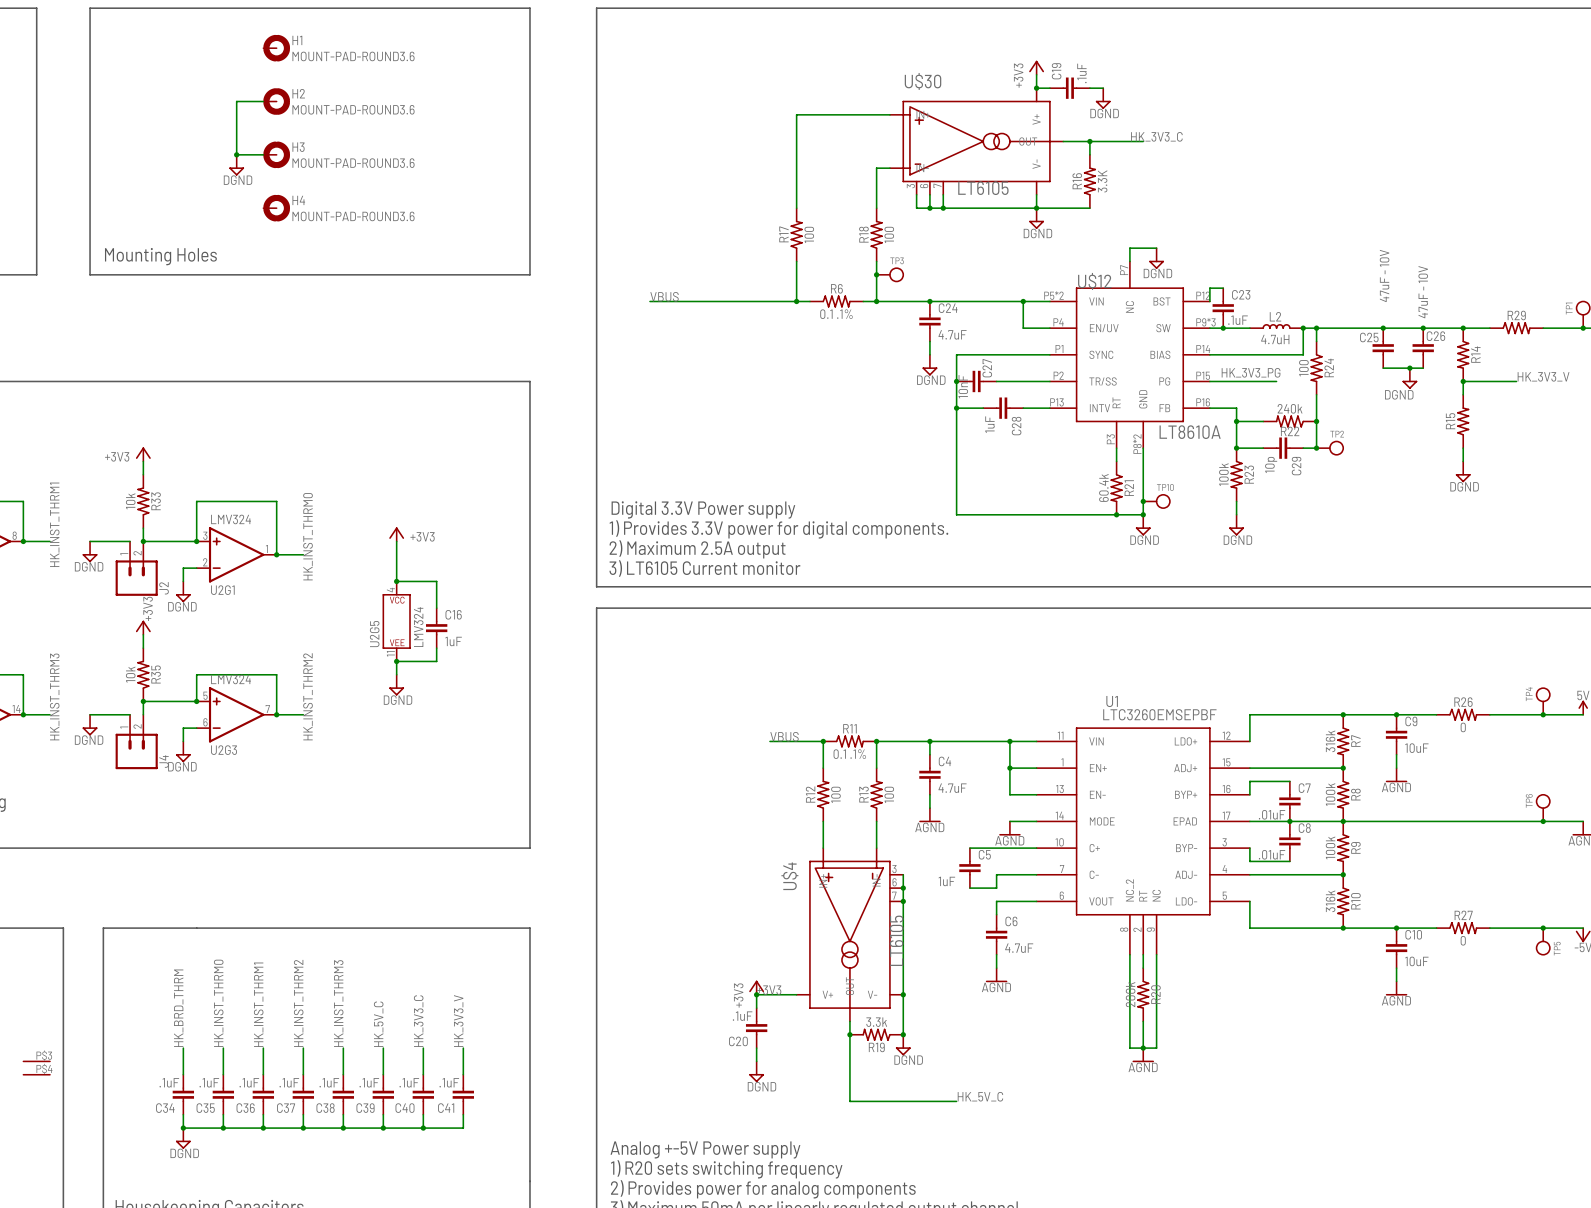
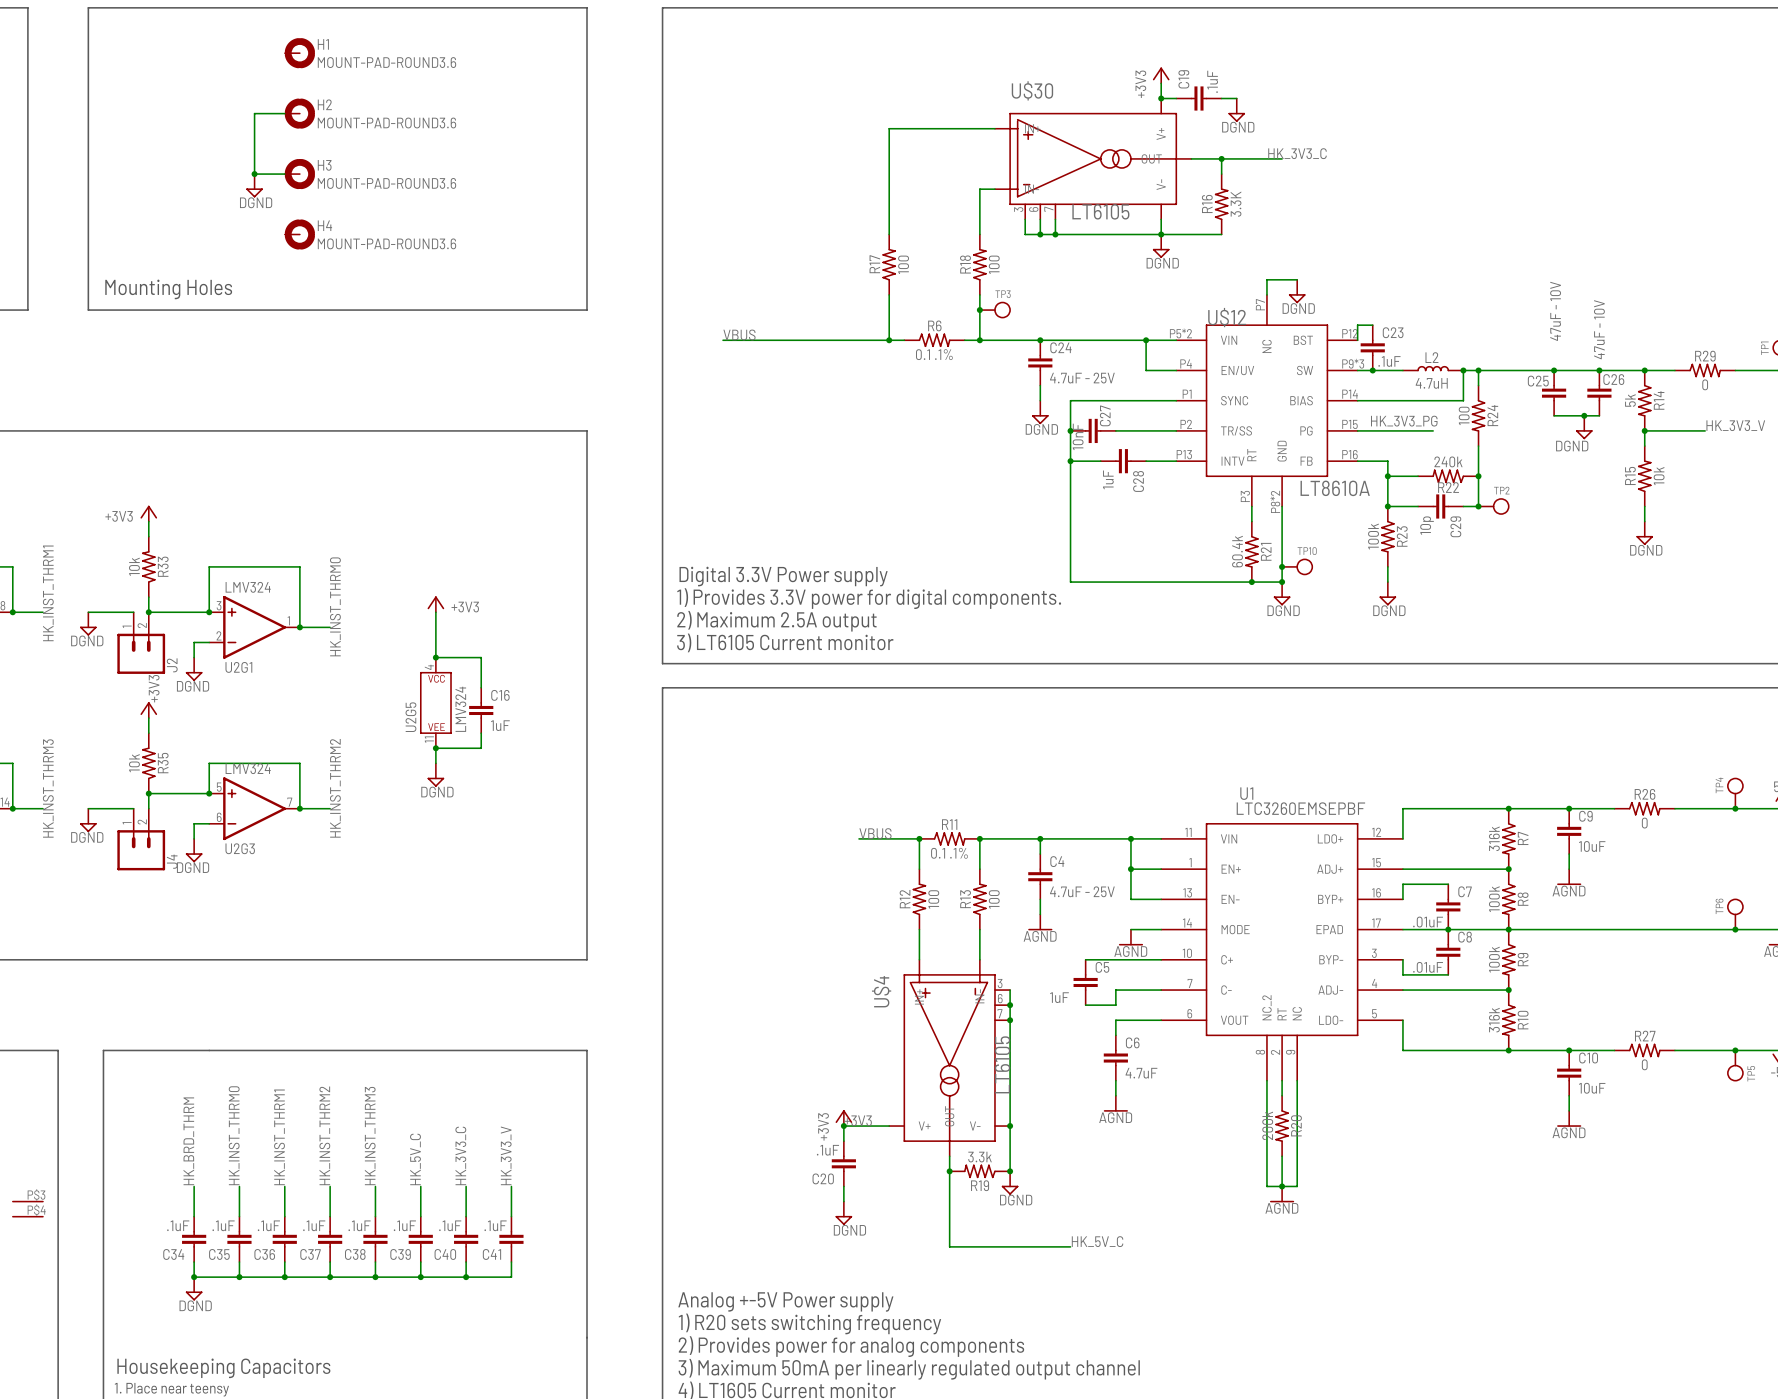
C24 value: 4.7uF (952, 334) -> 4.7uF - 25V (1082, 378)
R29 value: none -> 0 (1705, 384)
R14 value: none -> 5k (1630, 400)
R15 value: none -> 10k (1659, 476)
C4 value: 4.7uF (952, 788) -> 4.7uF - 25V (1082, 891)

